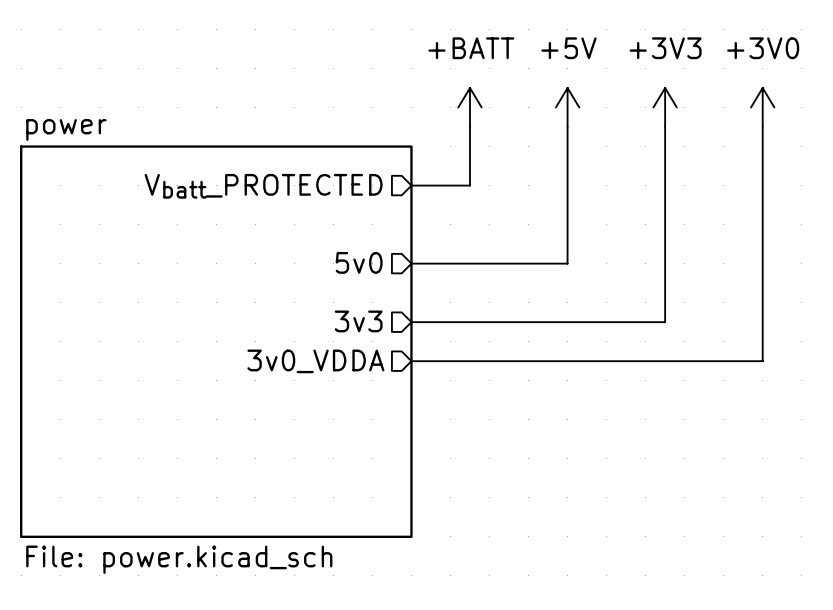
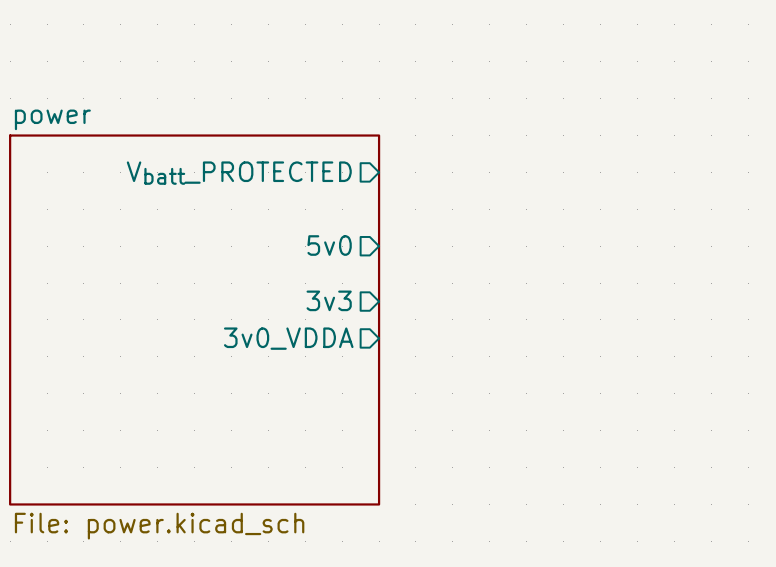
power symbol: +BATT (470, 107) -> none
power symbol: +5V (567, 107) -> none
power symbol: +3V3 (665, 107) -> none
power symbol: +3V0 (762, 107) -> none
wire: (470, 127) (470, 185) (411, 185) -> none
wire: (567, 127) (567, 263) (411, 263) -> none
wire: (665, 127) (665, 322) (411, 322) -> none
wire: (762, 127) (762, 361) (411, 361) -> none

